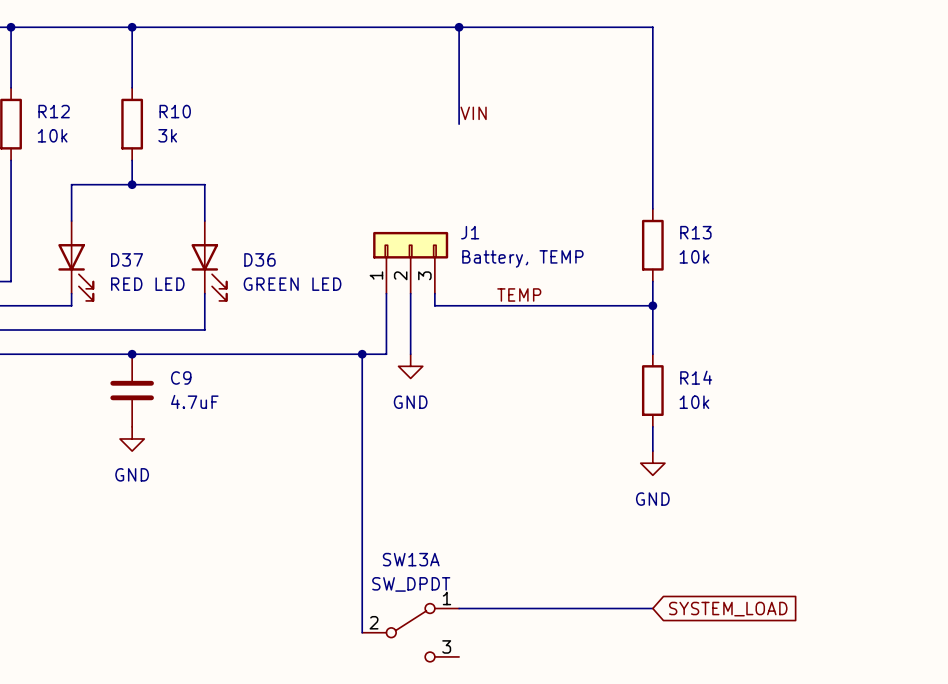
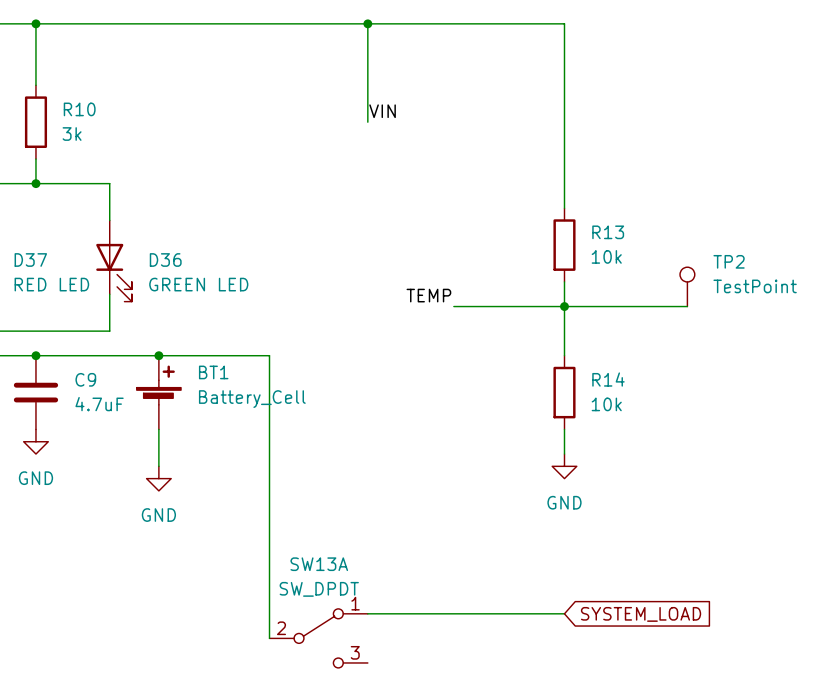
J1: Battery, TEMP (410, 262) -> none
TP2: none -> TestPoint (687, 286)
wire: (386, 293) (386, 354) (362, 354) -> none
wire: (410, 293) (410, 354) -> none
wire: (434, 293) (434, 305) (543, 305) -> none
wire: none -> (564, 306) (687, 306)
junction: none -> (158, 355)
junction: (362, 354) -> none
power symbol position: GND (410, 366) -> GND (158, 478)
BT1: none -> Battery_Cell (158, 392)
wire: none -> (158, 429) (158, 466)

